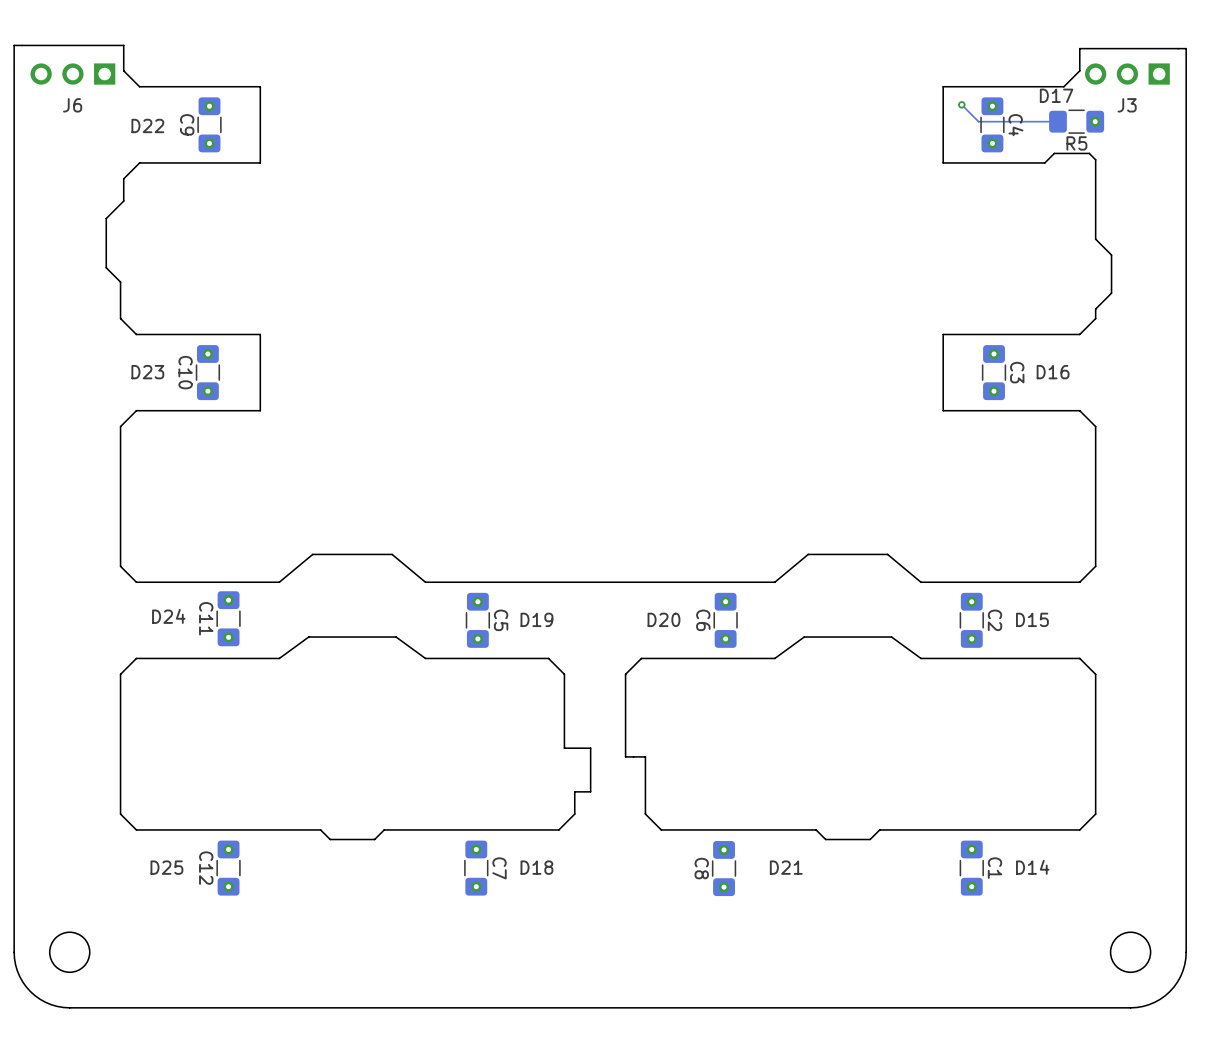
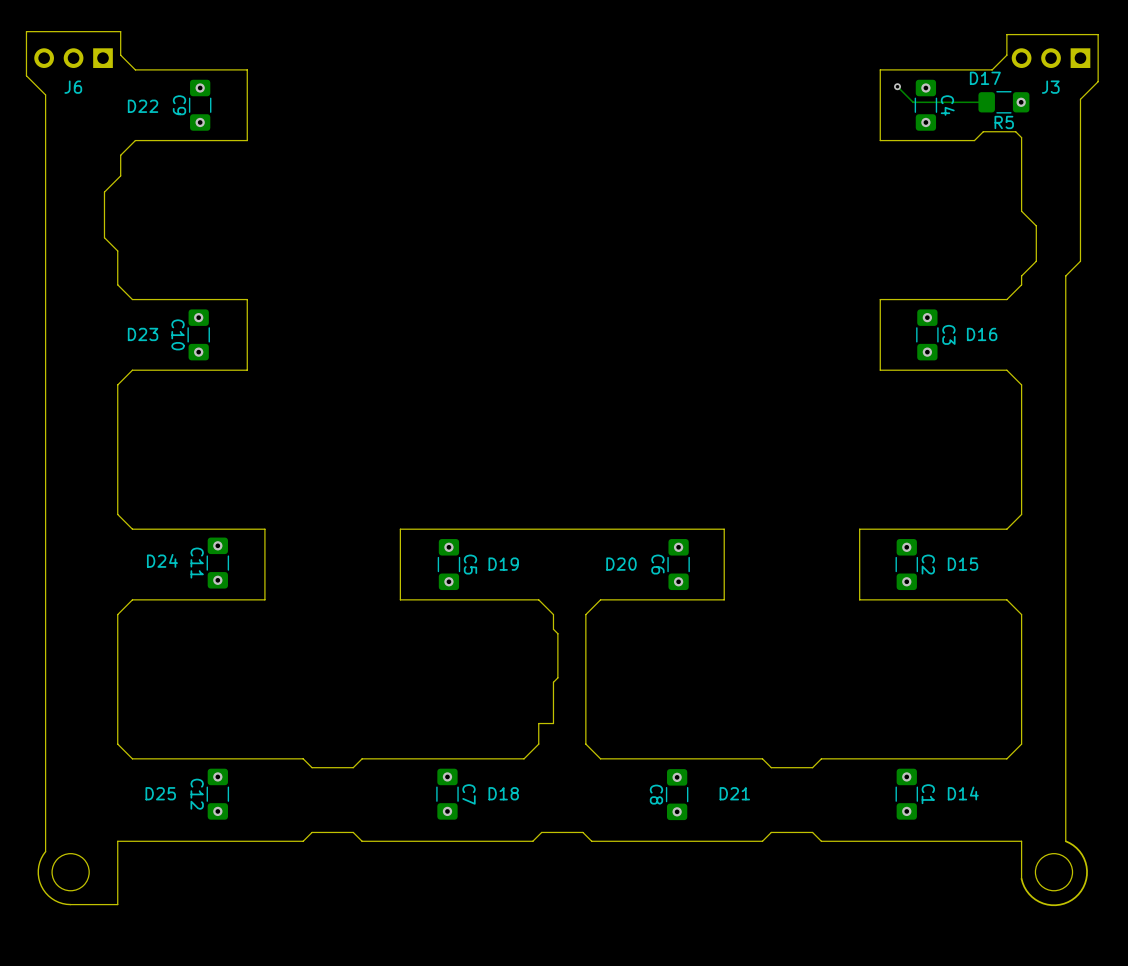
board edge: (22, 45) (14, 45) (14, 952) (17, 970) (30, 991) (51, 1004) (69, 1007) (1130, 1007) (1148, 1004) (1165, 995) (1180, 976) (1186, 952) (1186, 48) (1178, 48) -> (45, 851) (39, 862) (38, 874) (43, 889) (51, 898) (66, 904) (117, 904) (117, 841) (303, 841) (312, 832) (353, 832) (362, 841) (532, 841) (541, 832) (582, 832) (591, 841) (762, 841) (771, 832) (812, 832) (821, 841) (1021, 841) (1021, 878) (1029, 894) (1039, 901) (1051, 905) (1064, 903) (1075, 897) (1085, 883) (1087, 870) (1082, 854) (1076, 848) (1065, 841) (1065, 276) (1080, 261) (1080, 99) (1098, 81) (1098, 34)
board edge: none -> (26, 31) (26, 75) (45, 94) (45, 851)
board edge: (425, 582) (392, 554) (312, 554) (279, 582) -> (400, 529) (400, 599)
board edge: (920, 582) (887, 554) (808, 554) (774, 582) -> (859, 529) (859, 599)
board edge: (425, 658) (396, 637) (308, 637) (279, 658) -> (264, 529) (264, 599)
board edge: (548, 658) (564, 674) (564, 748) (590, 748) -> (514, 599) (538, 599) (553, 614) (553, 629) (557, 633) (557, 677) (553, 683)
board edge: (920, 658) (891, 637) (804, 637) (774, 658) -> (724, 529) (724, 599)
board edge: (625, 756) (645, 756) (645, 814) (661, 829) -> (585, 691) (585, 744) (600, 758) (618, 758)

